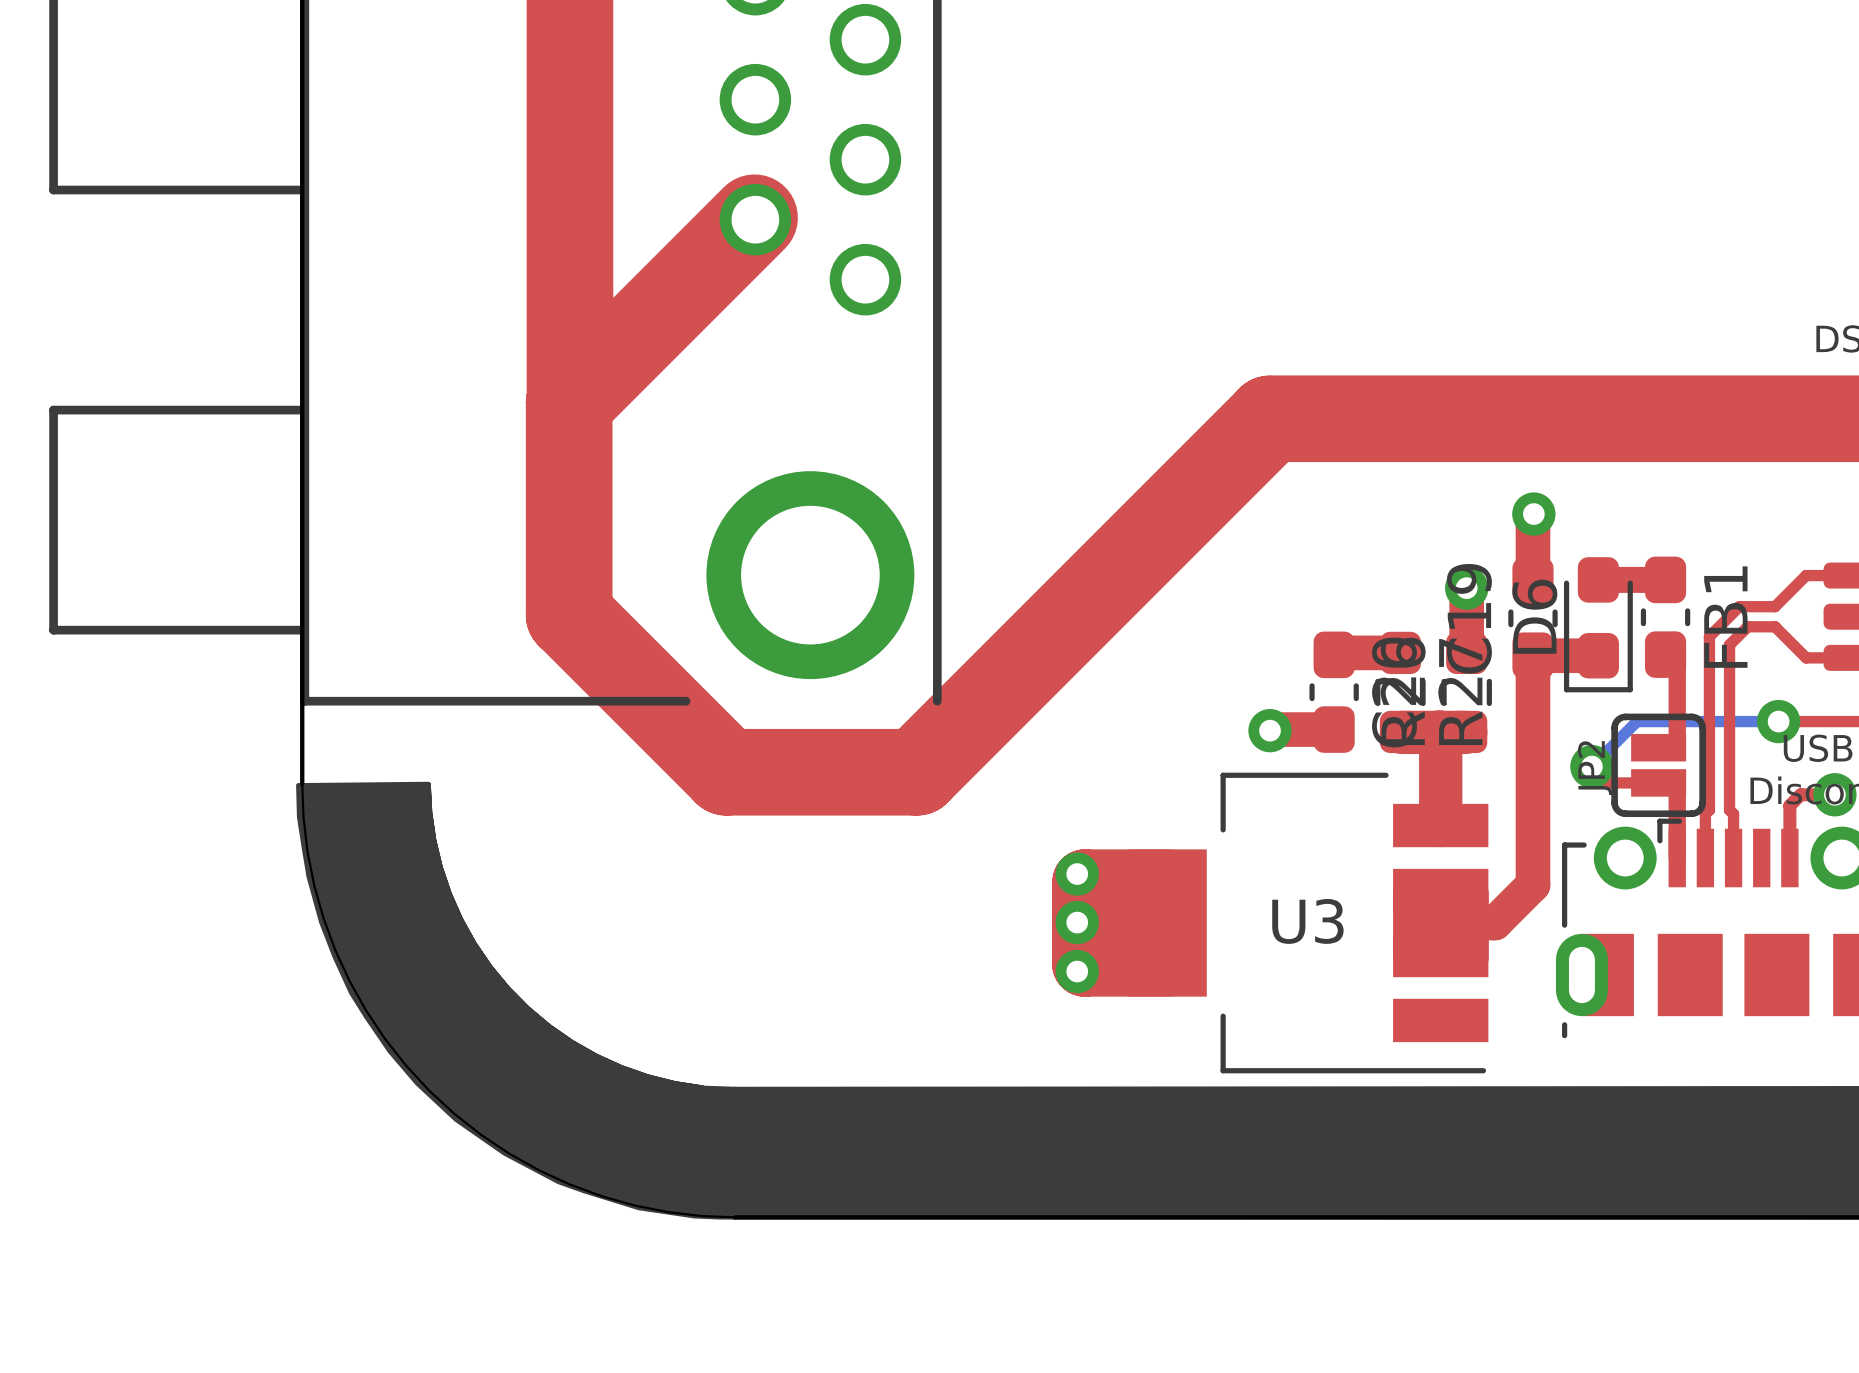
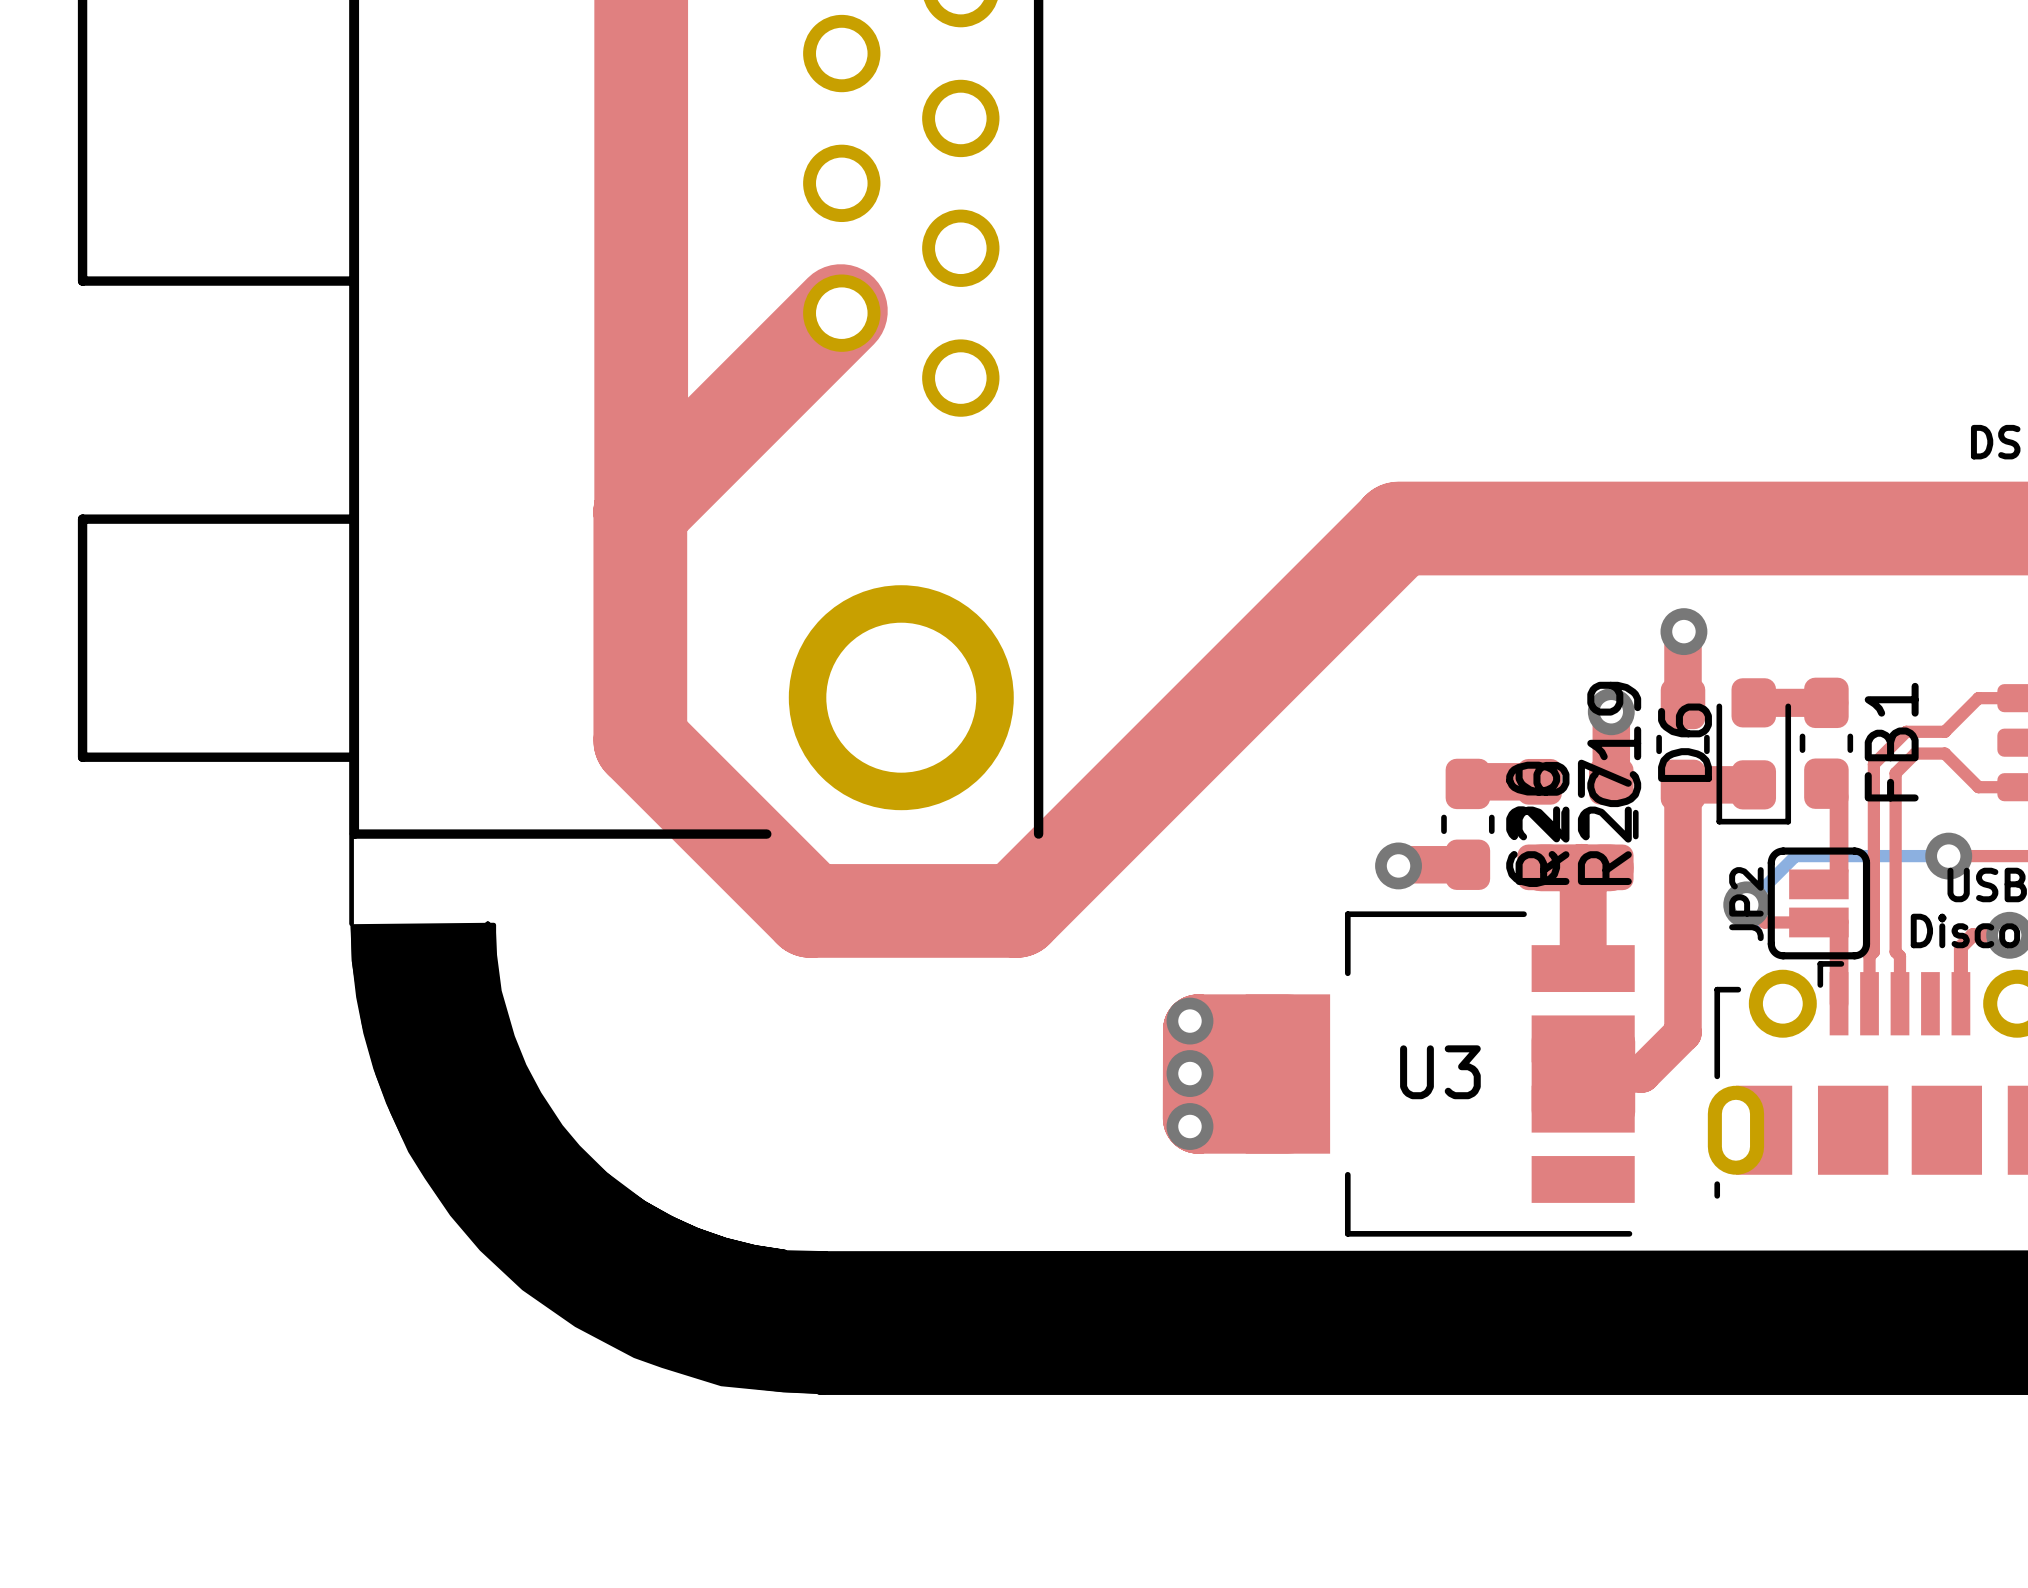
drawing shape: [296, 781, 738, 1220] -> [350, 922, 829, 1395]

